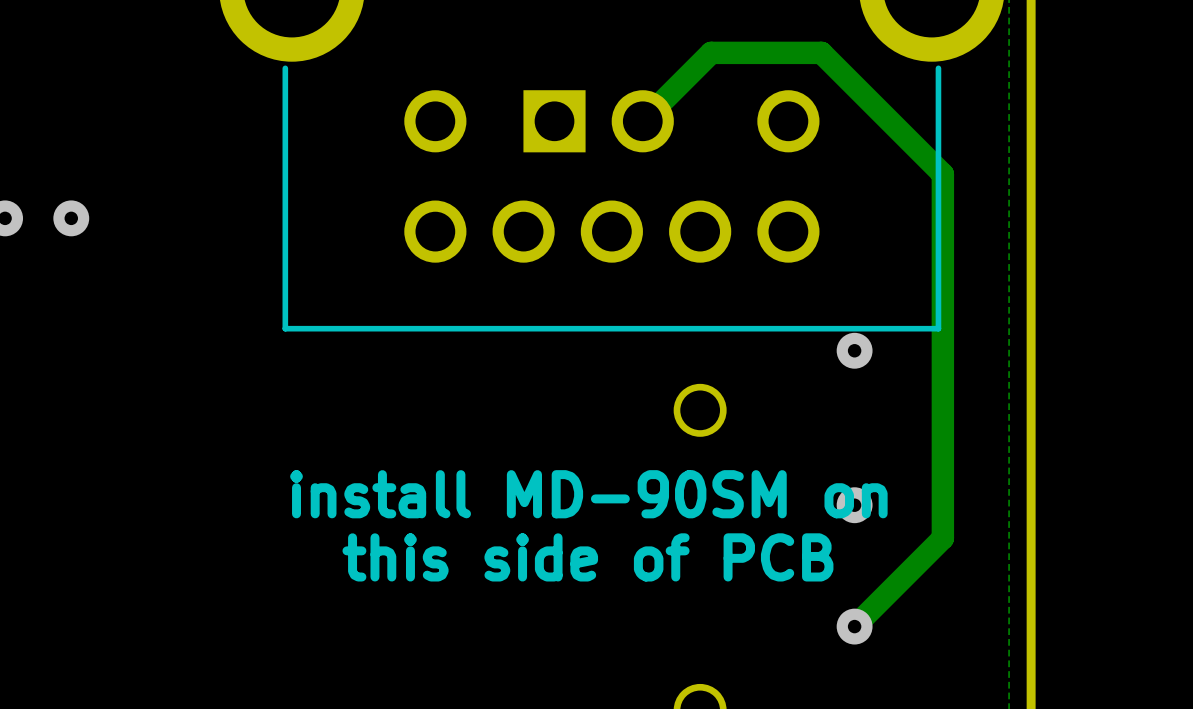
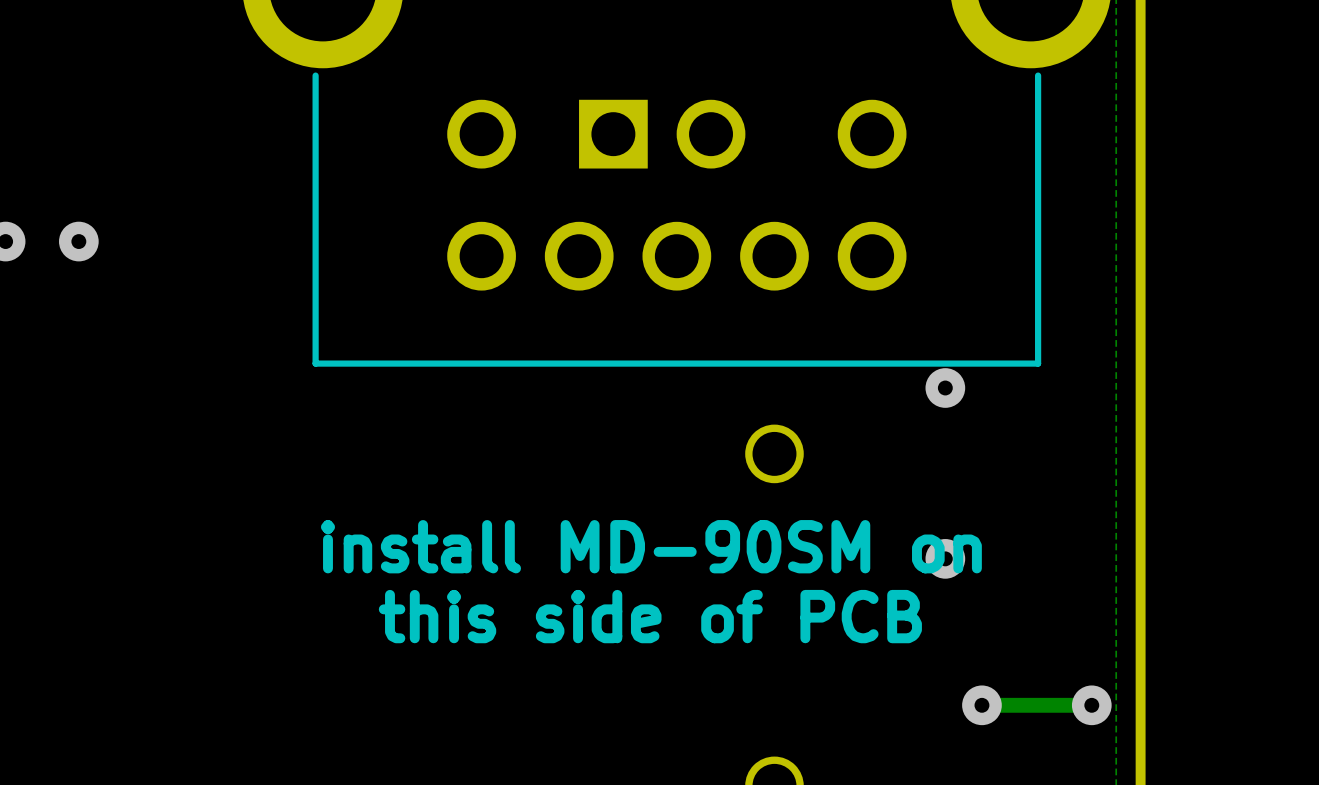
track: (642, 121) (711, 52) (821, 52) (942, 174) (942, 538) (854, 626) -> none
via position: (854, 626) -> (981, 705)
track: none -> (1091, 705) (981, 705)
via: none -> (1091, 705)

